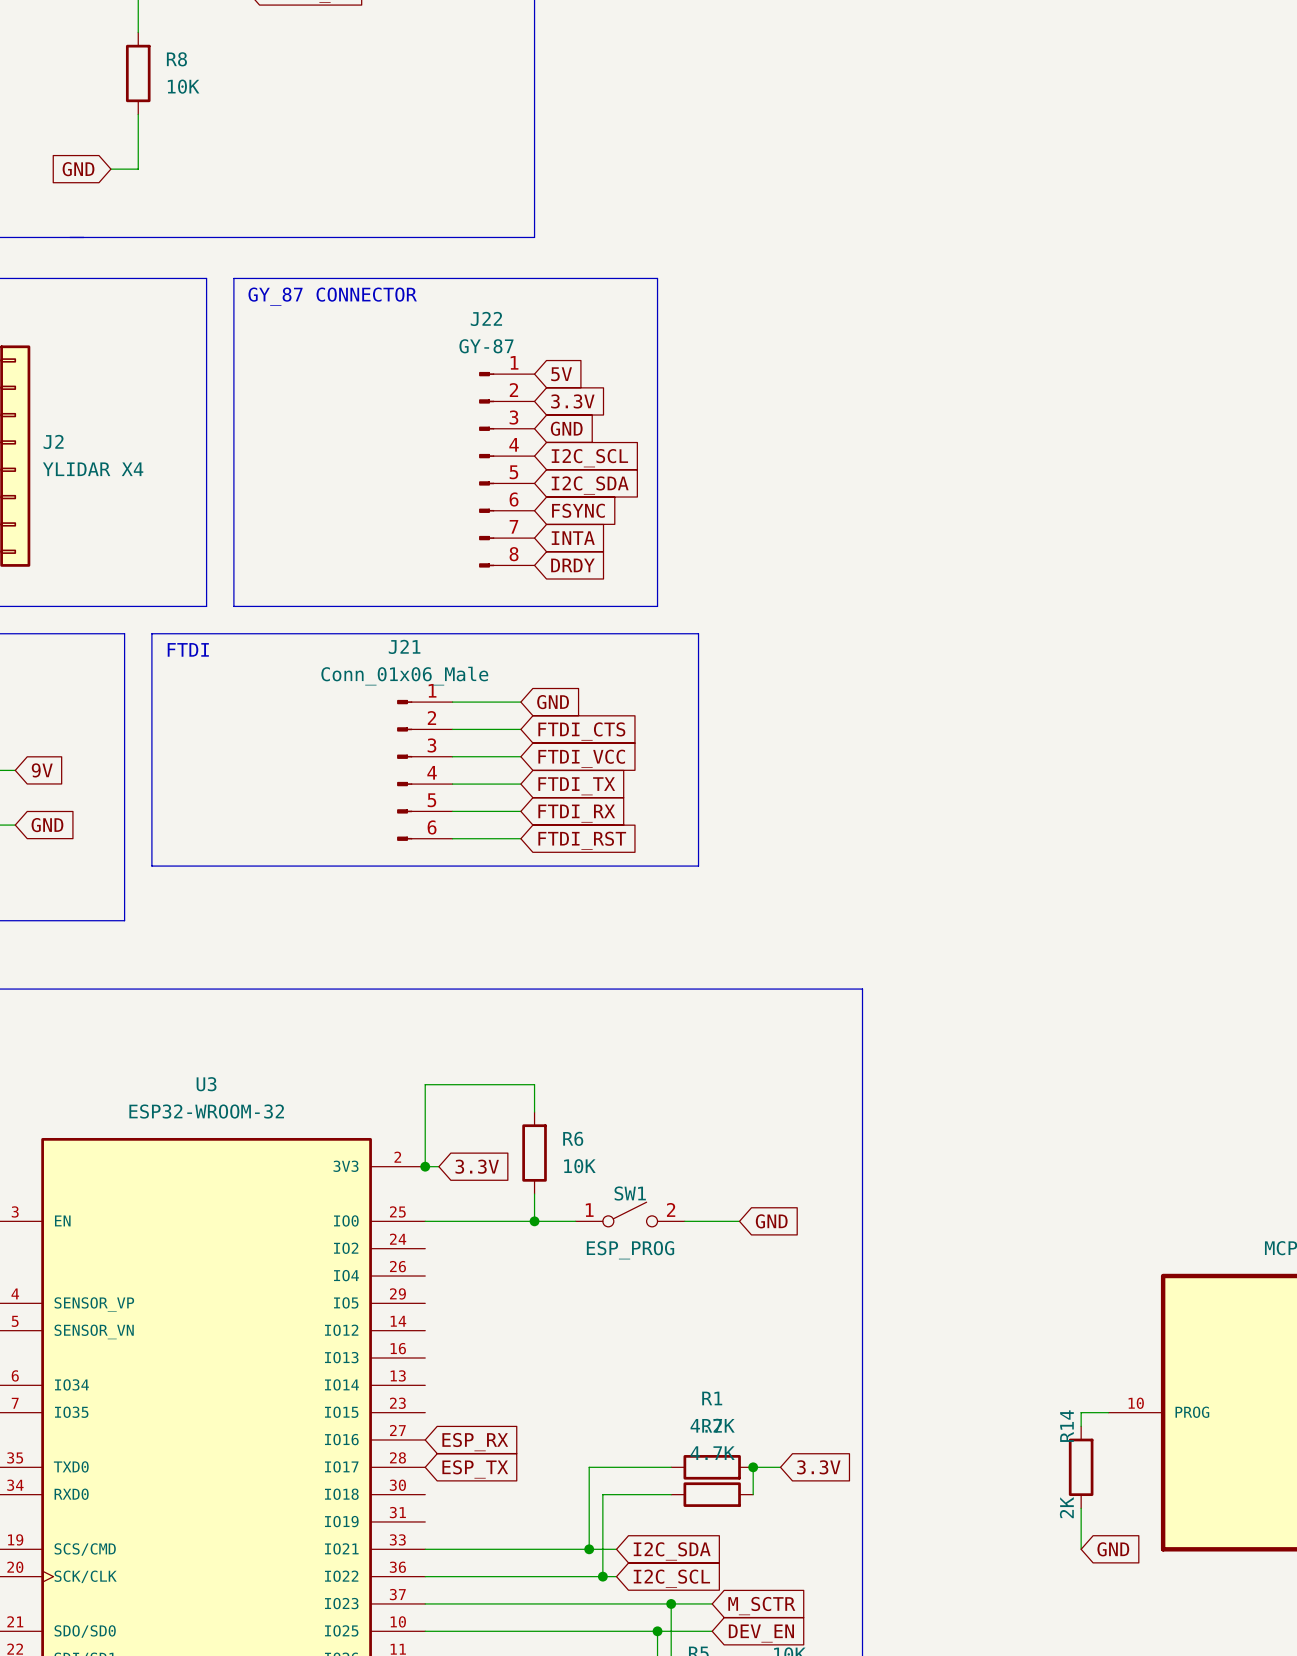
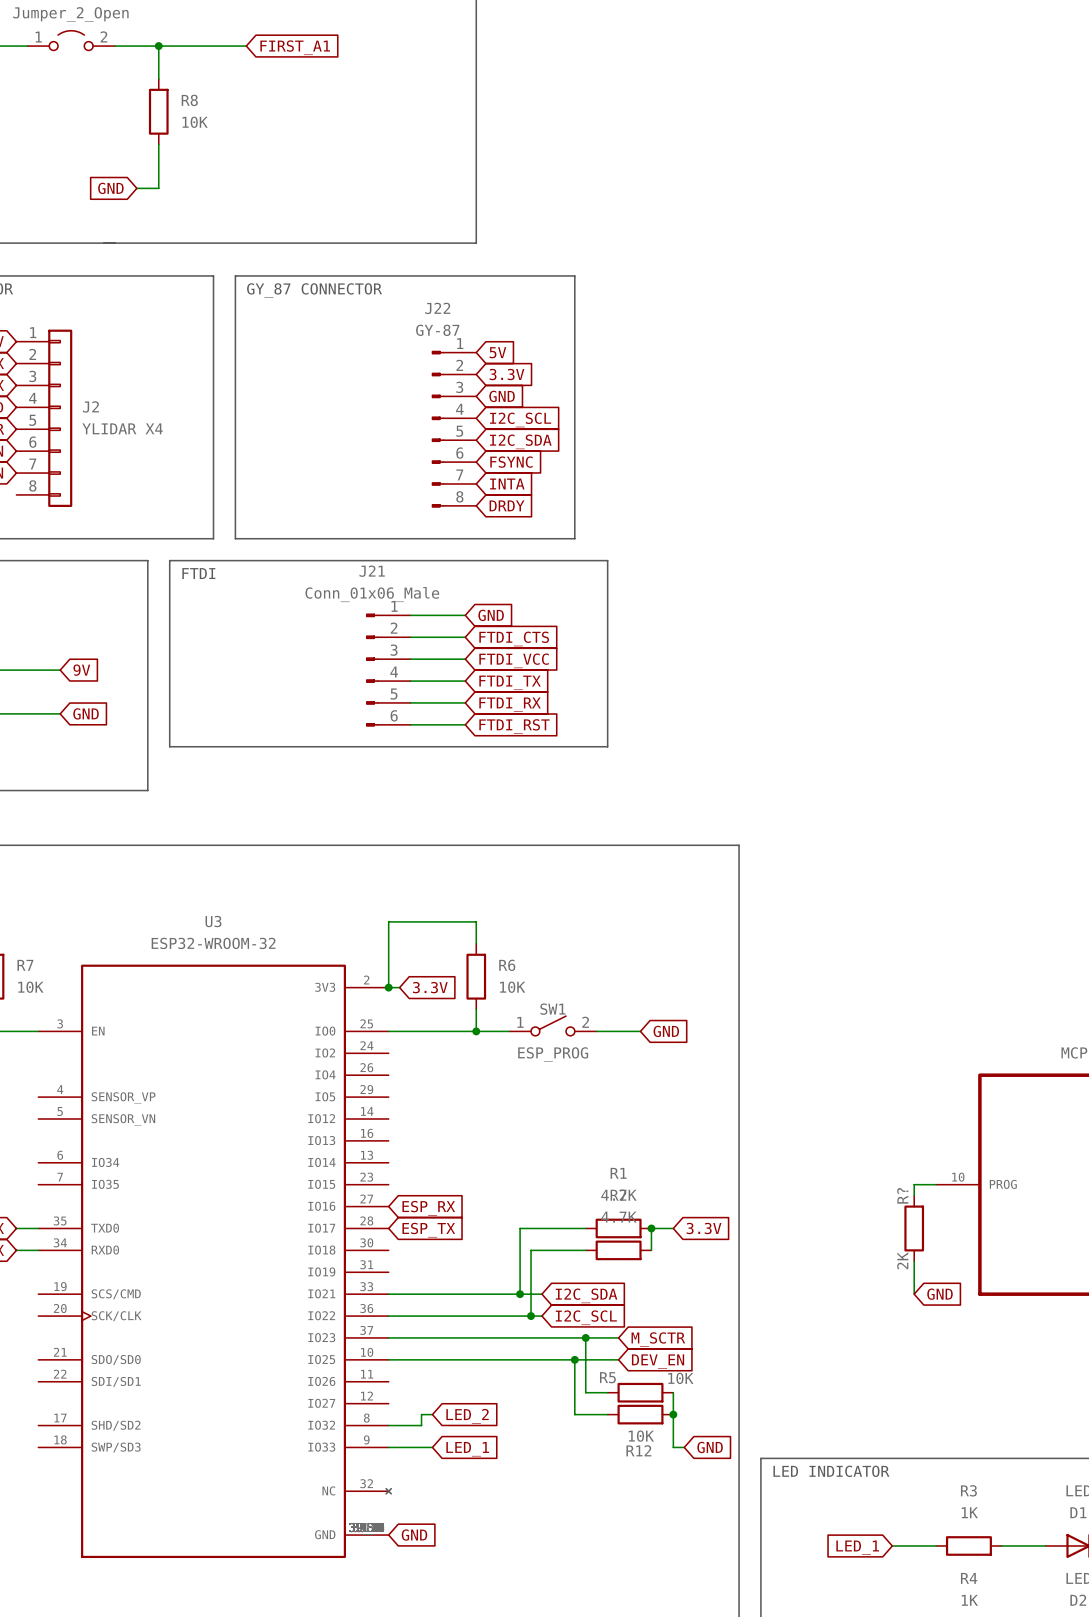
R14 name: R14 (1066, 1426) -> R? (902, 1195)

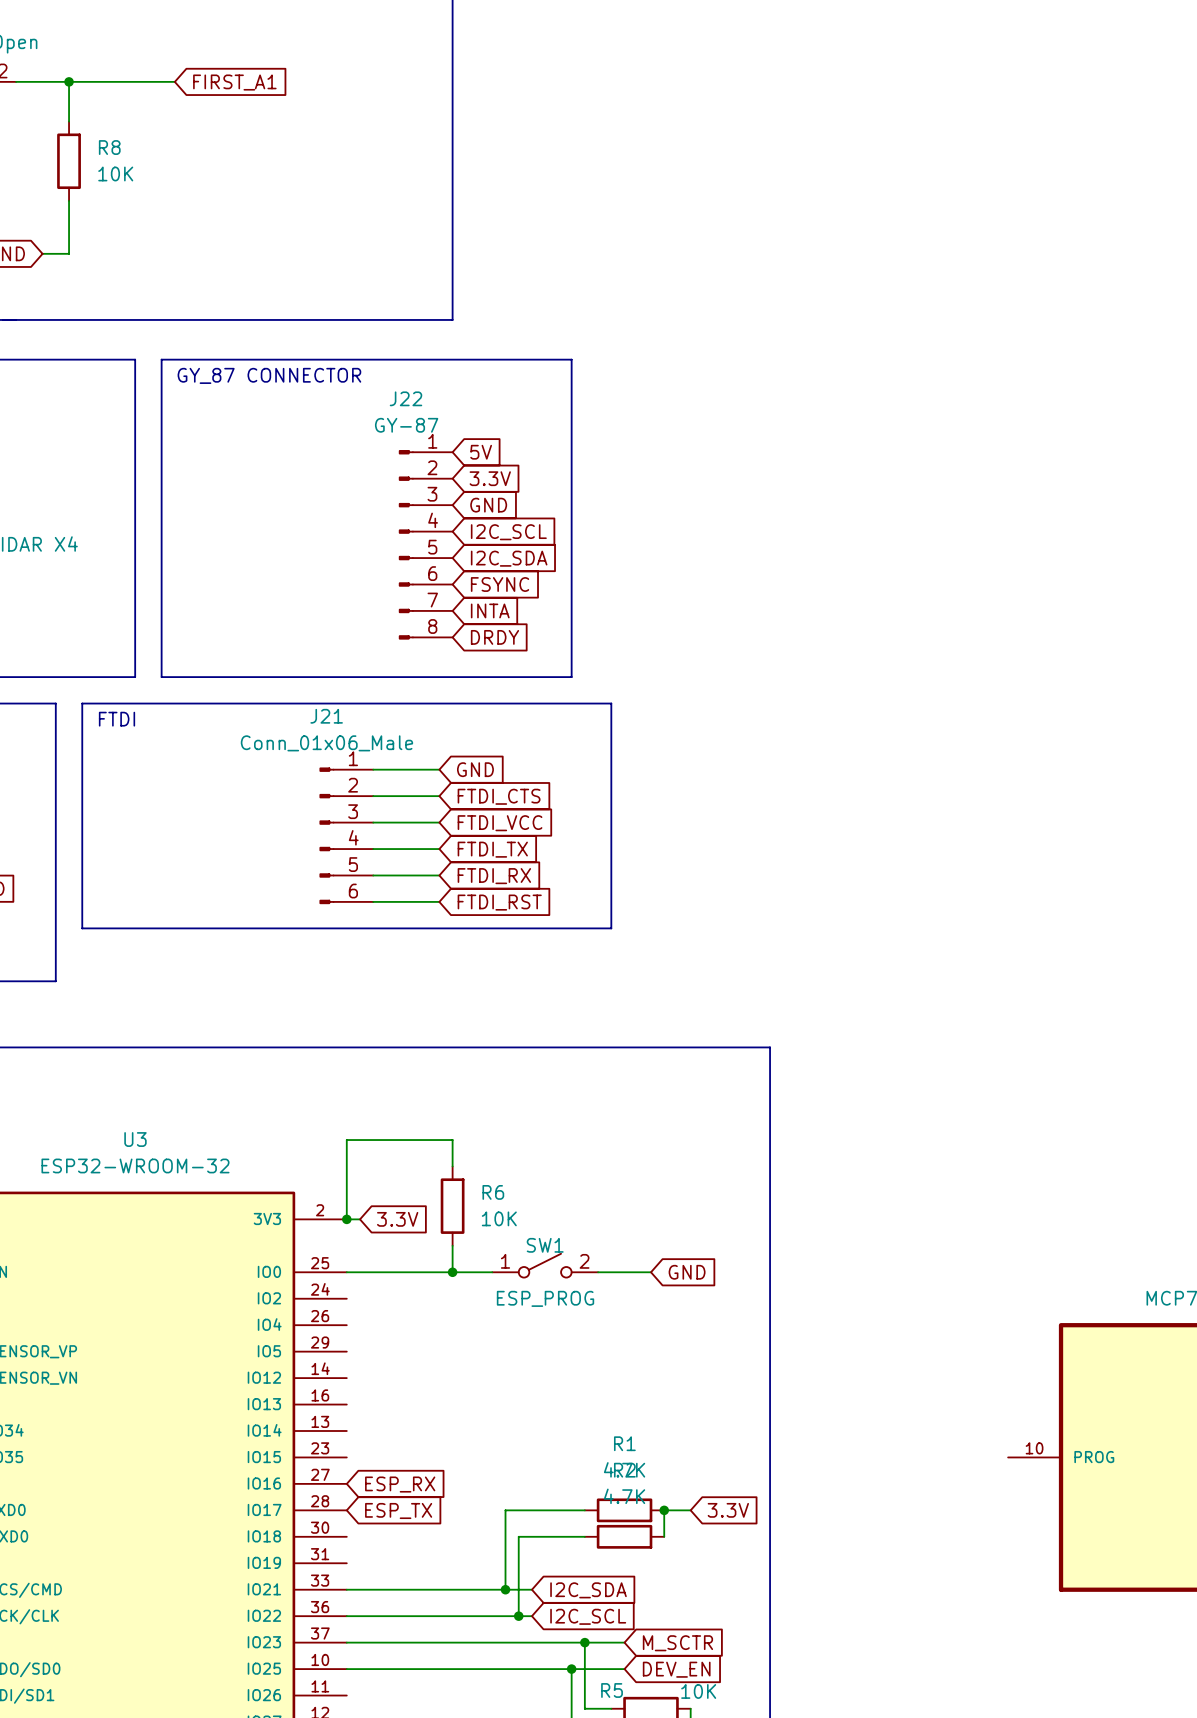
wire: (936, 1184) (914, 1184) (914, 1195) -> none
R?: 2K (914, 1228) -> none
wire: (914, 1261) (914, 1294) -> none
global label: GND (939, 1294) -> none

